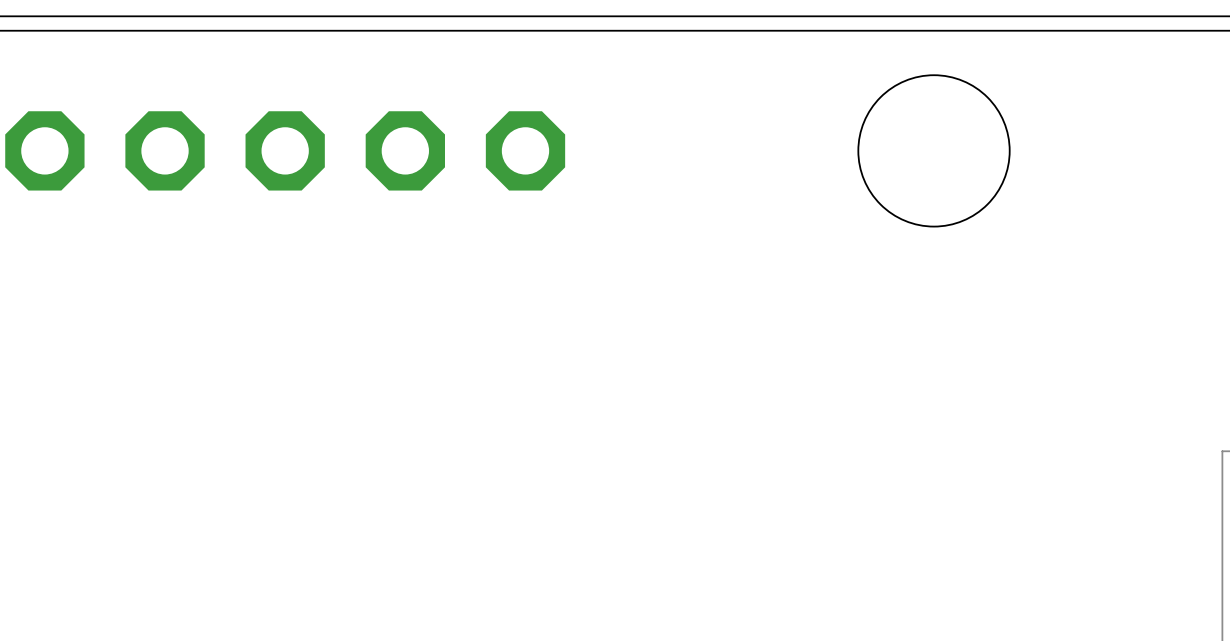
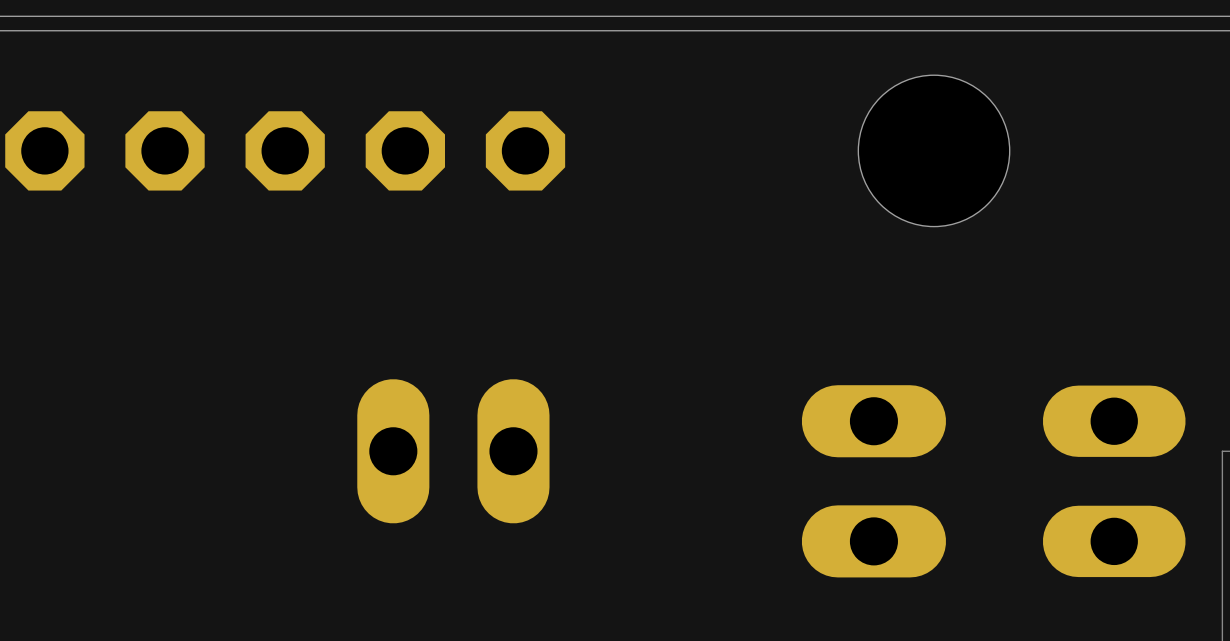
part: none -> (453, 451)
part: none -> (873, 481)
part: none -> (1114, 481)

